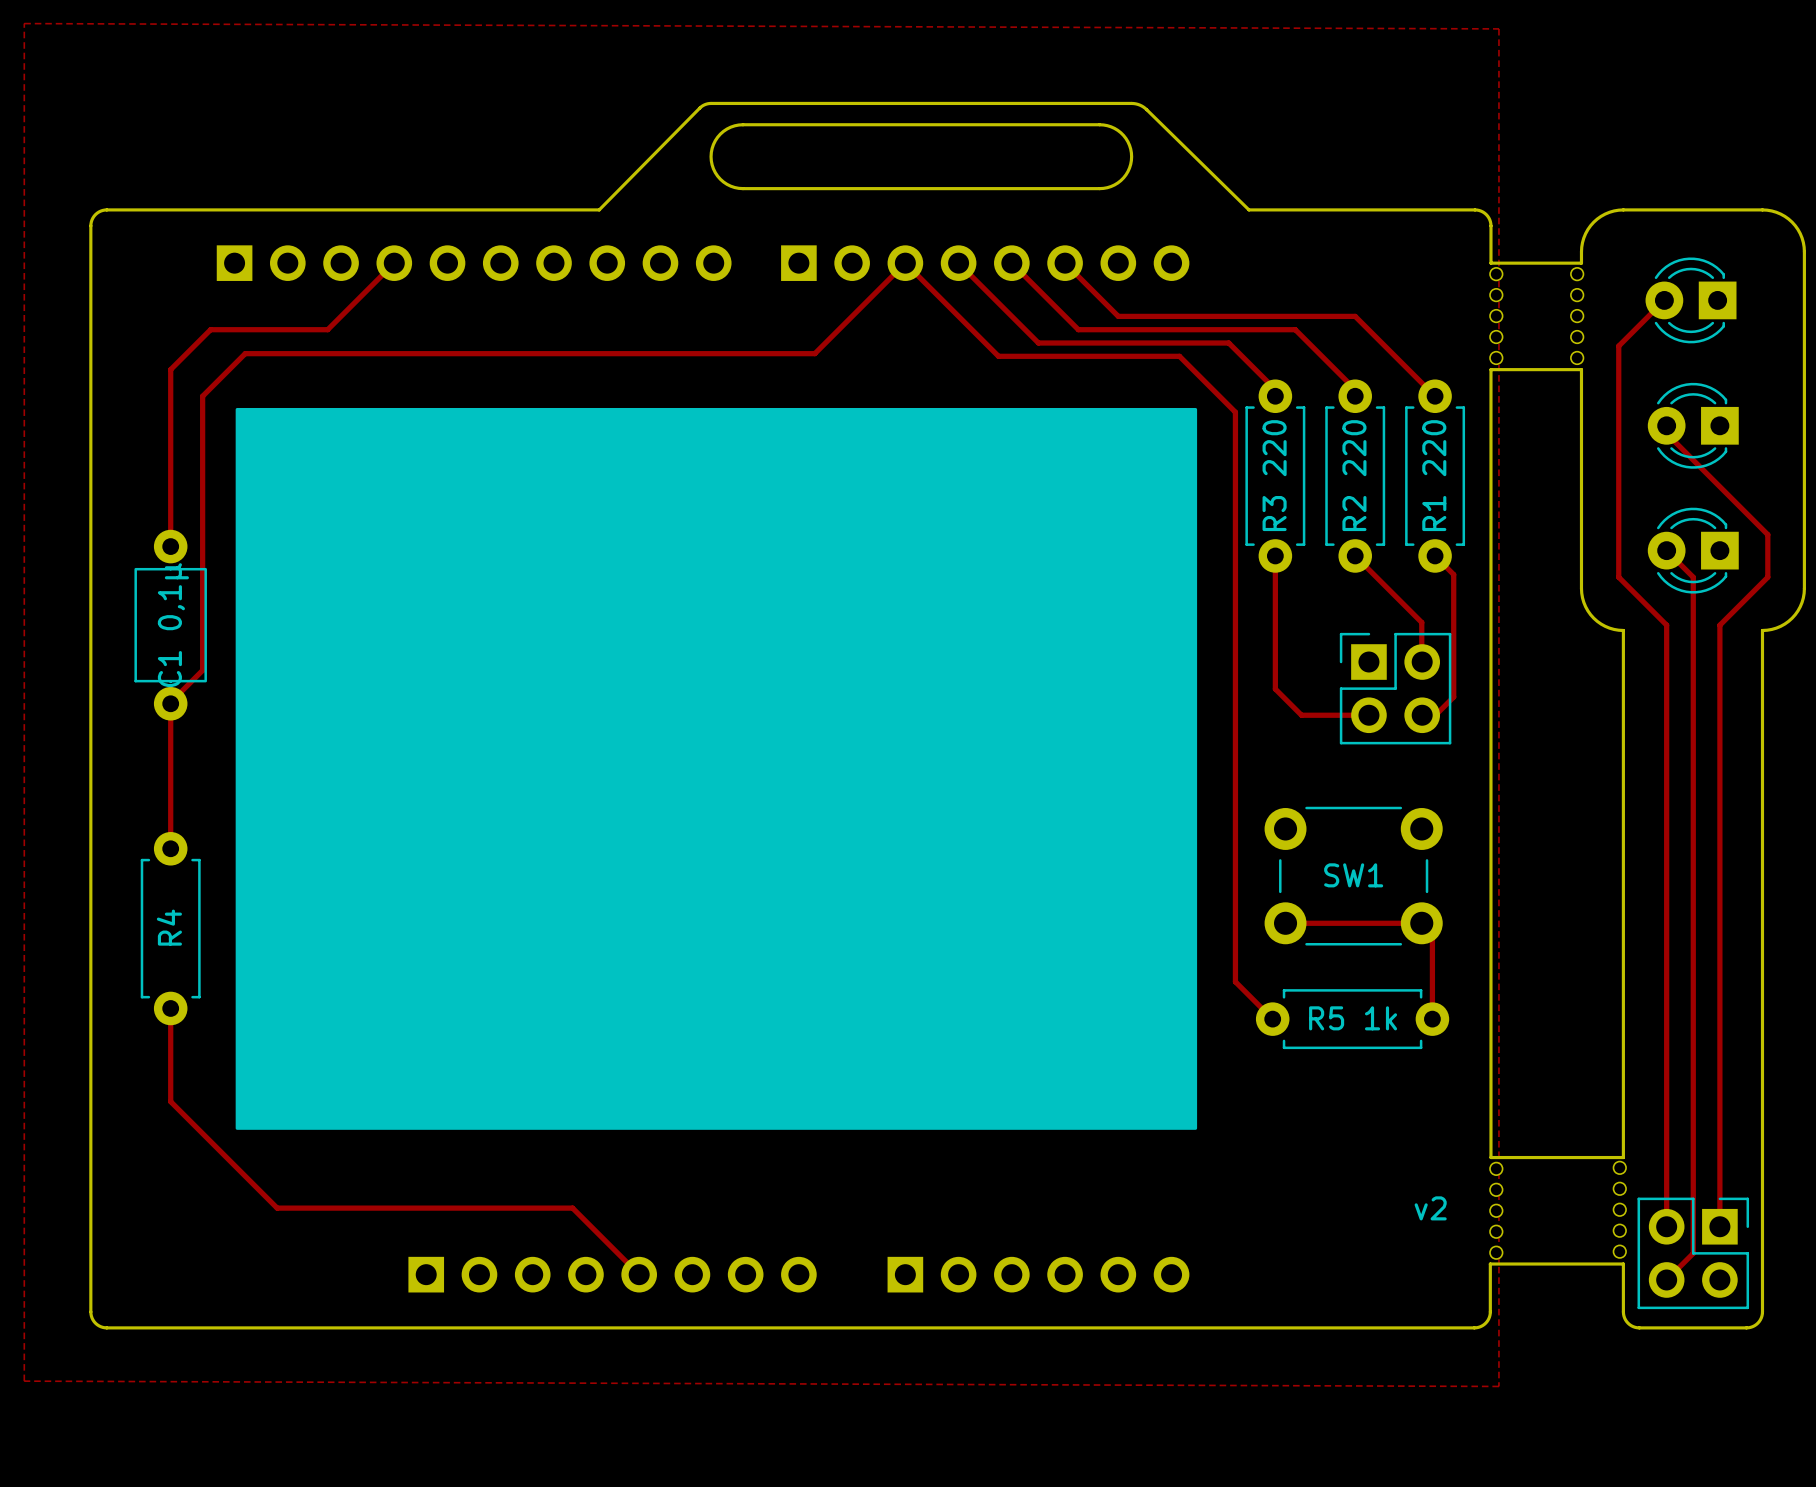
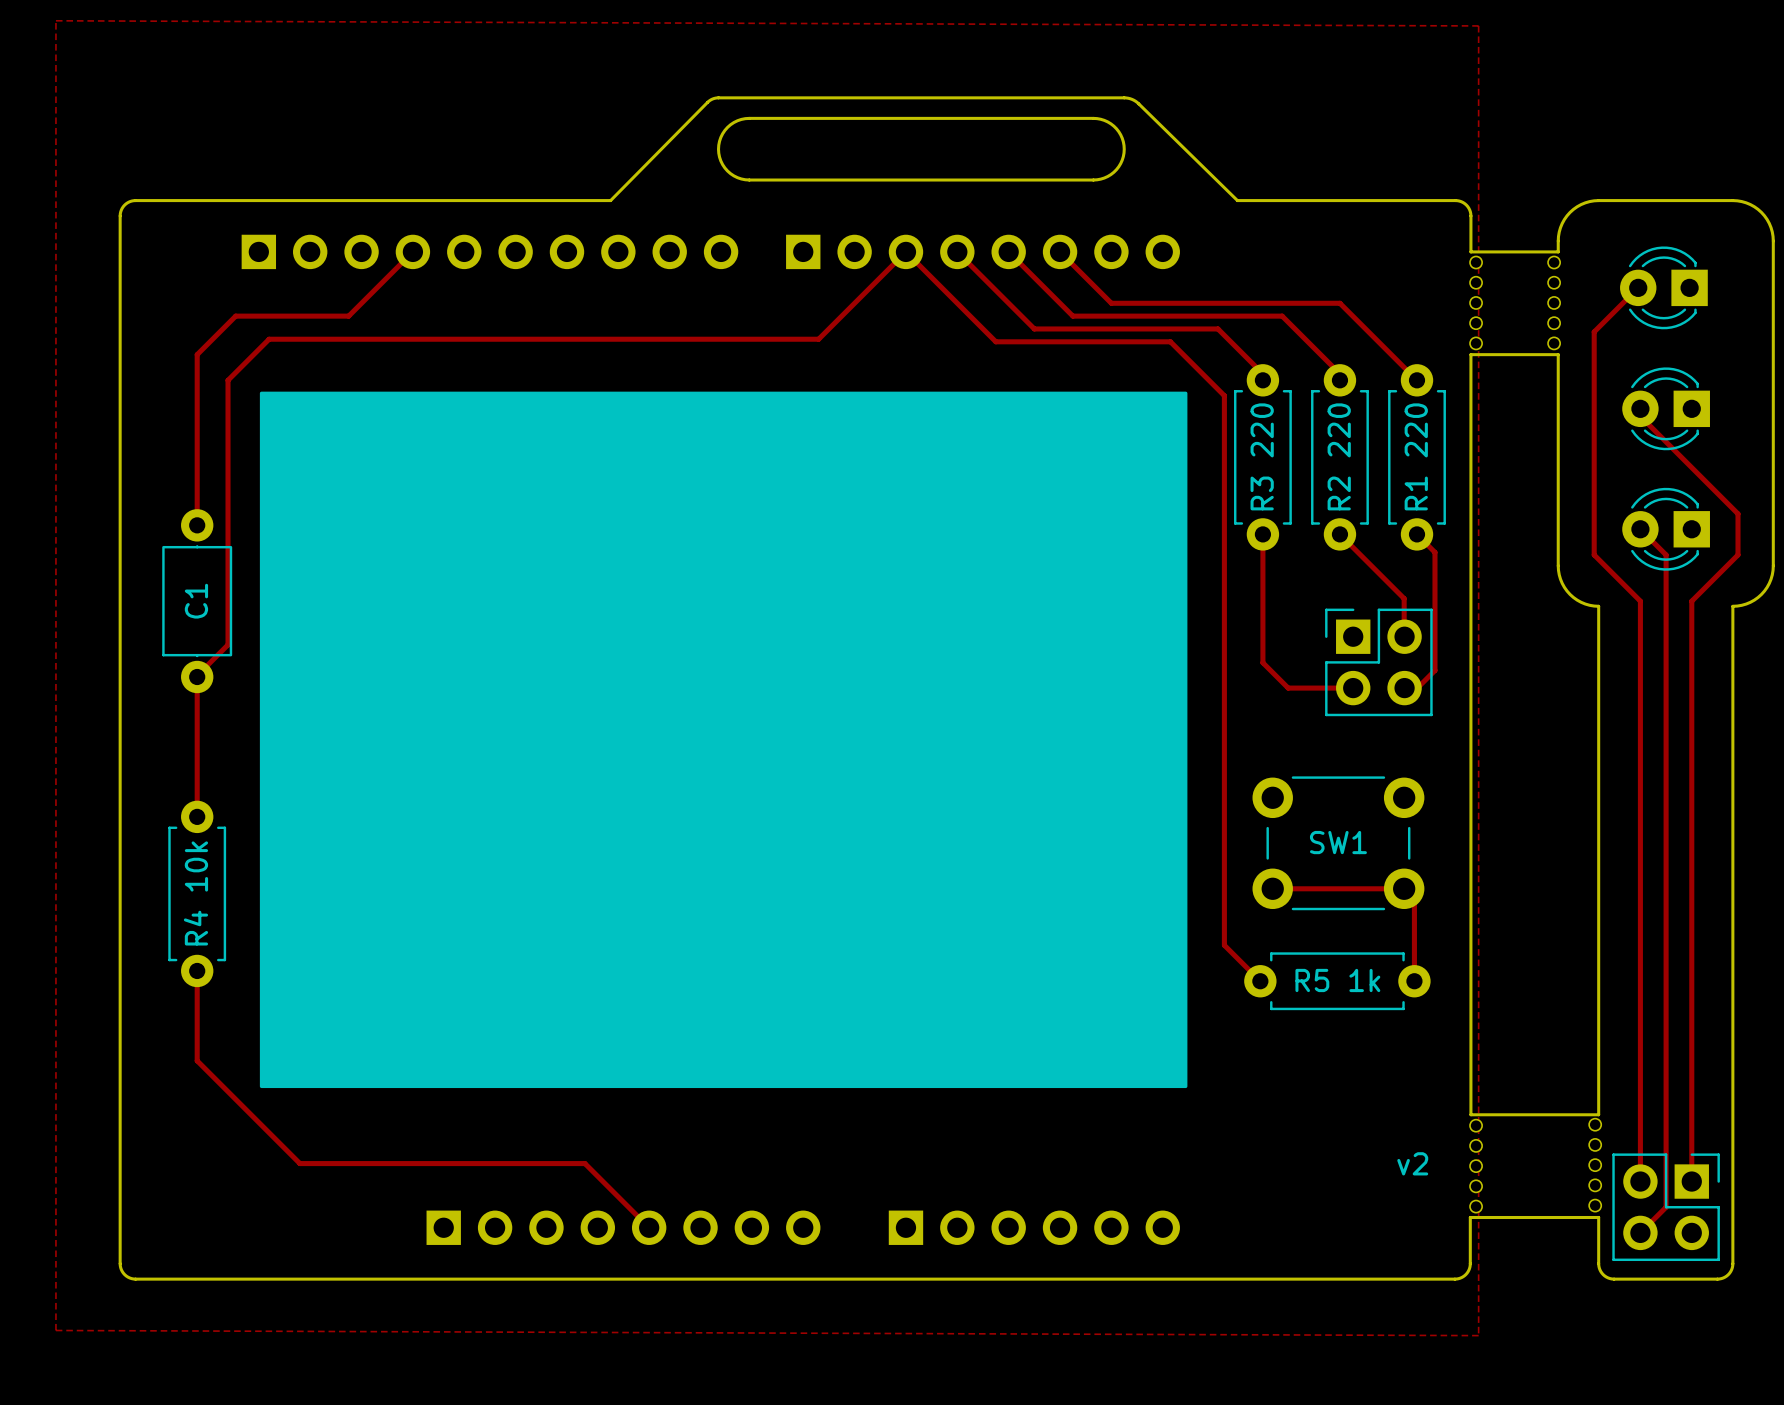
part text: C1 0,1µ (173, 625) -> C1 (196, 601)
R4 name: R4 (169, 927) -> R4 10k (195, 893)

